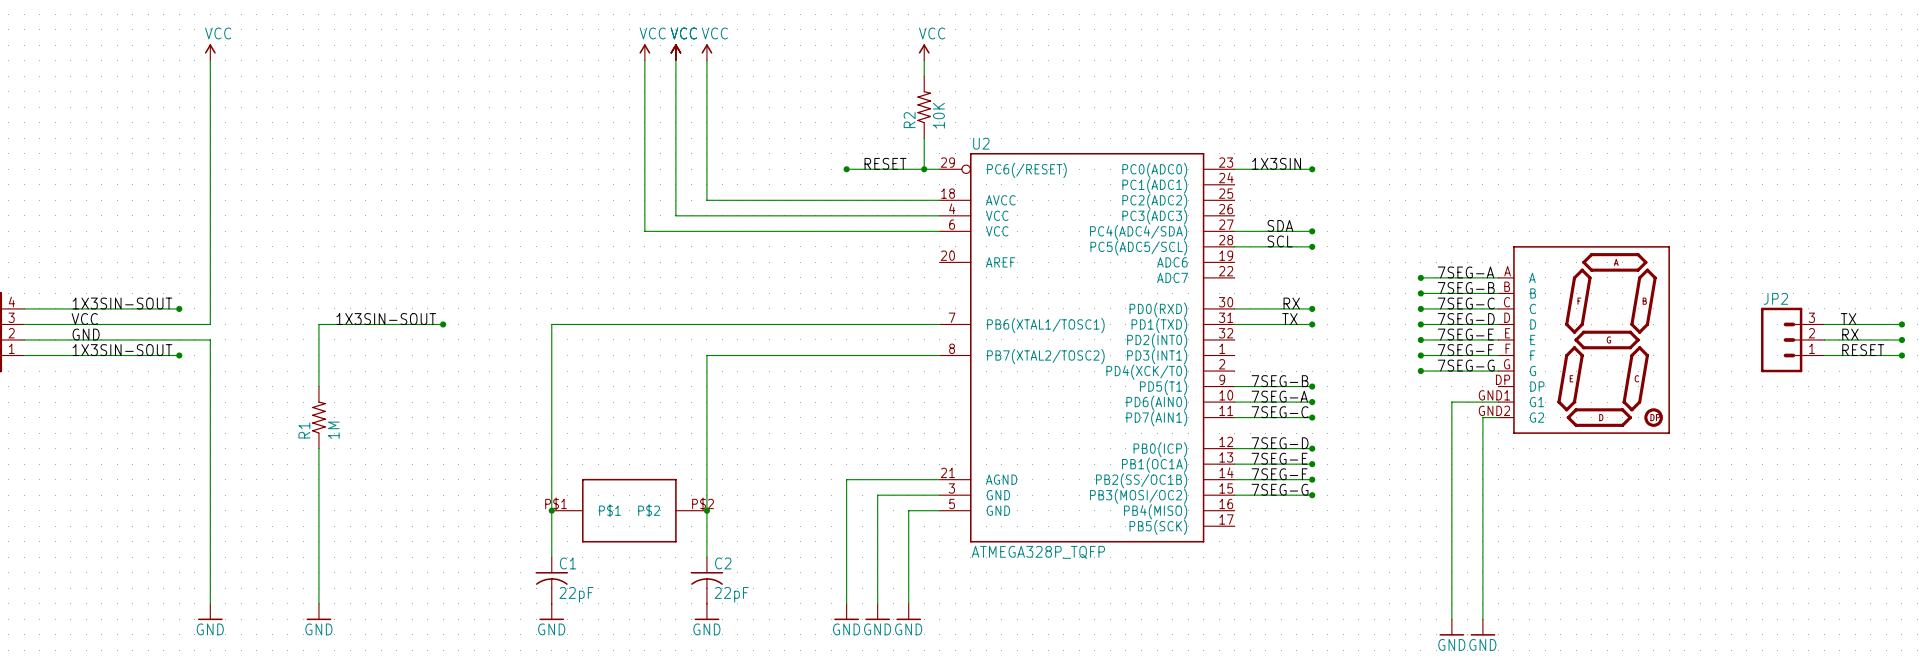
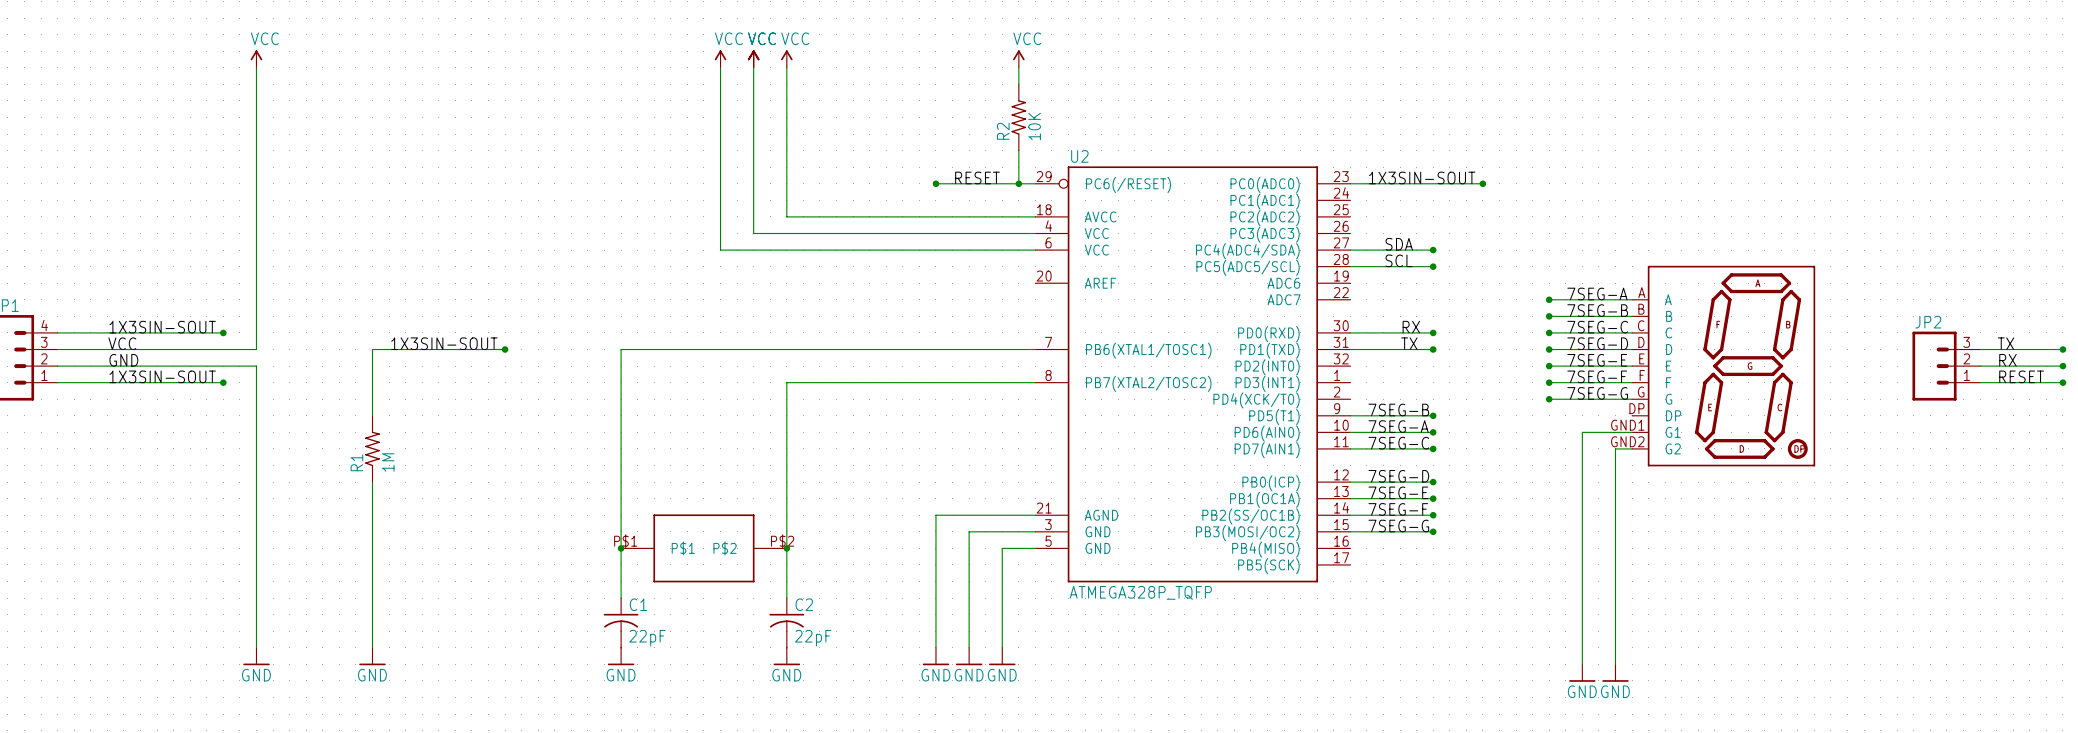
label: 1X3SIN (1276, 163) -> 1X3SIN-SOUT (1422, 177)
wire: none -> (1433, 183) (1482, 183)
junction: (1312, 169) -> none
junction: none -> (1482, 183)

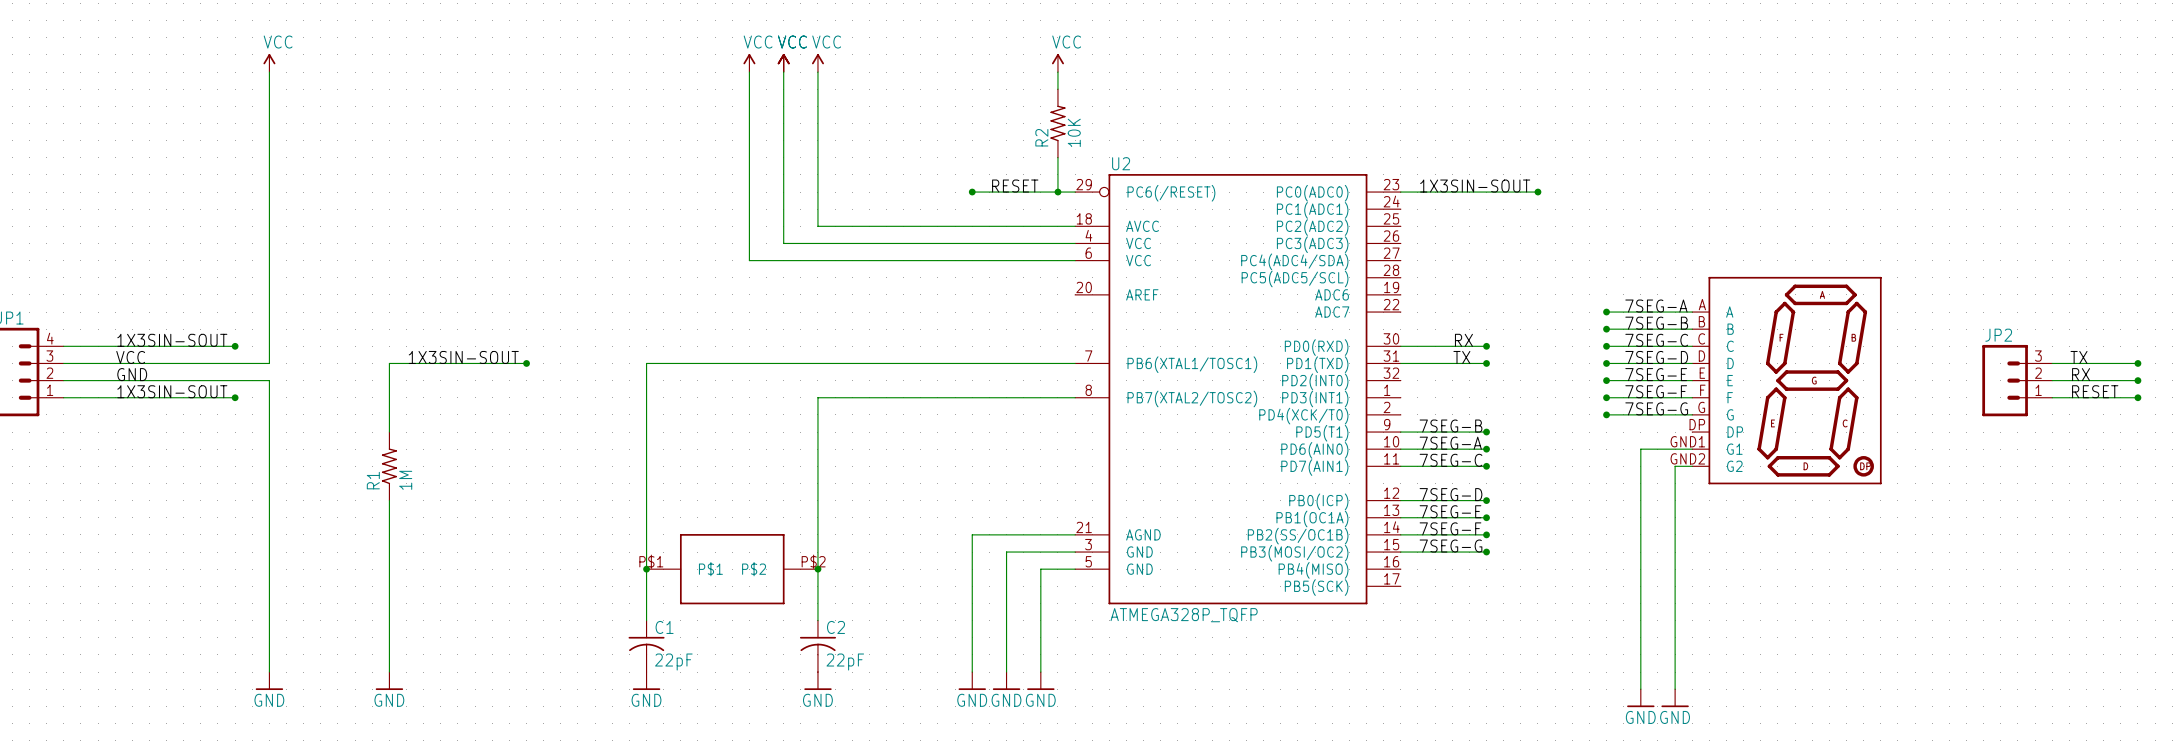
label: SDA (1399, 244) -> none
wire: (1350, 250) (1433, 250) -> none
junction: (1433, 250) -> none
label: SCL (1398, 260) -> none
wire: (1350, 266) (1433, 266) -> none
junction: (1433, 266) -> none

